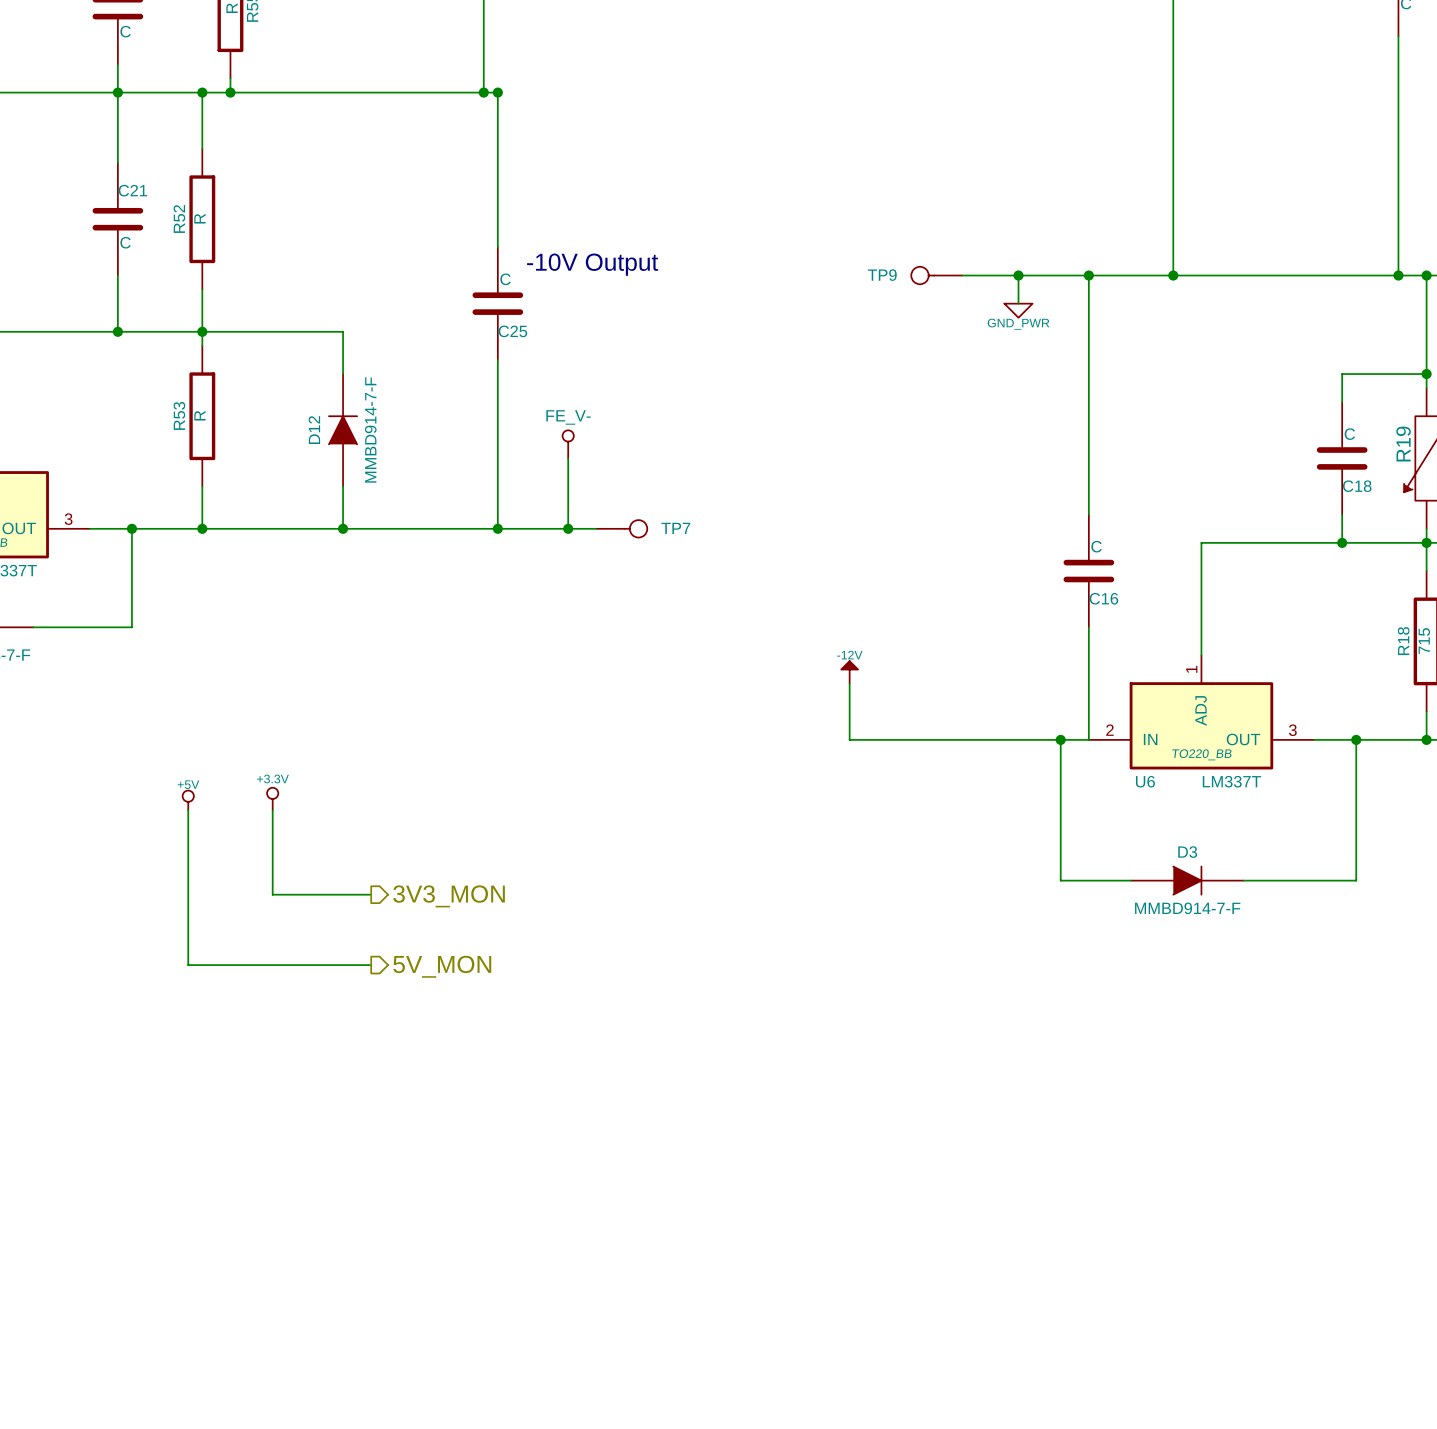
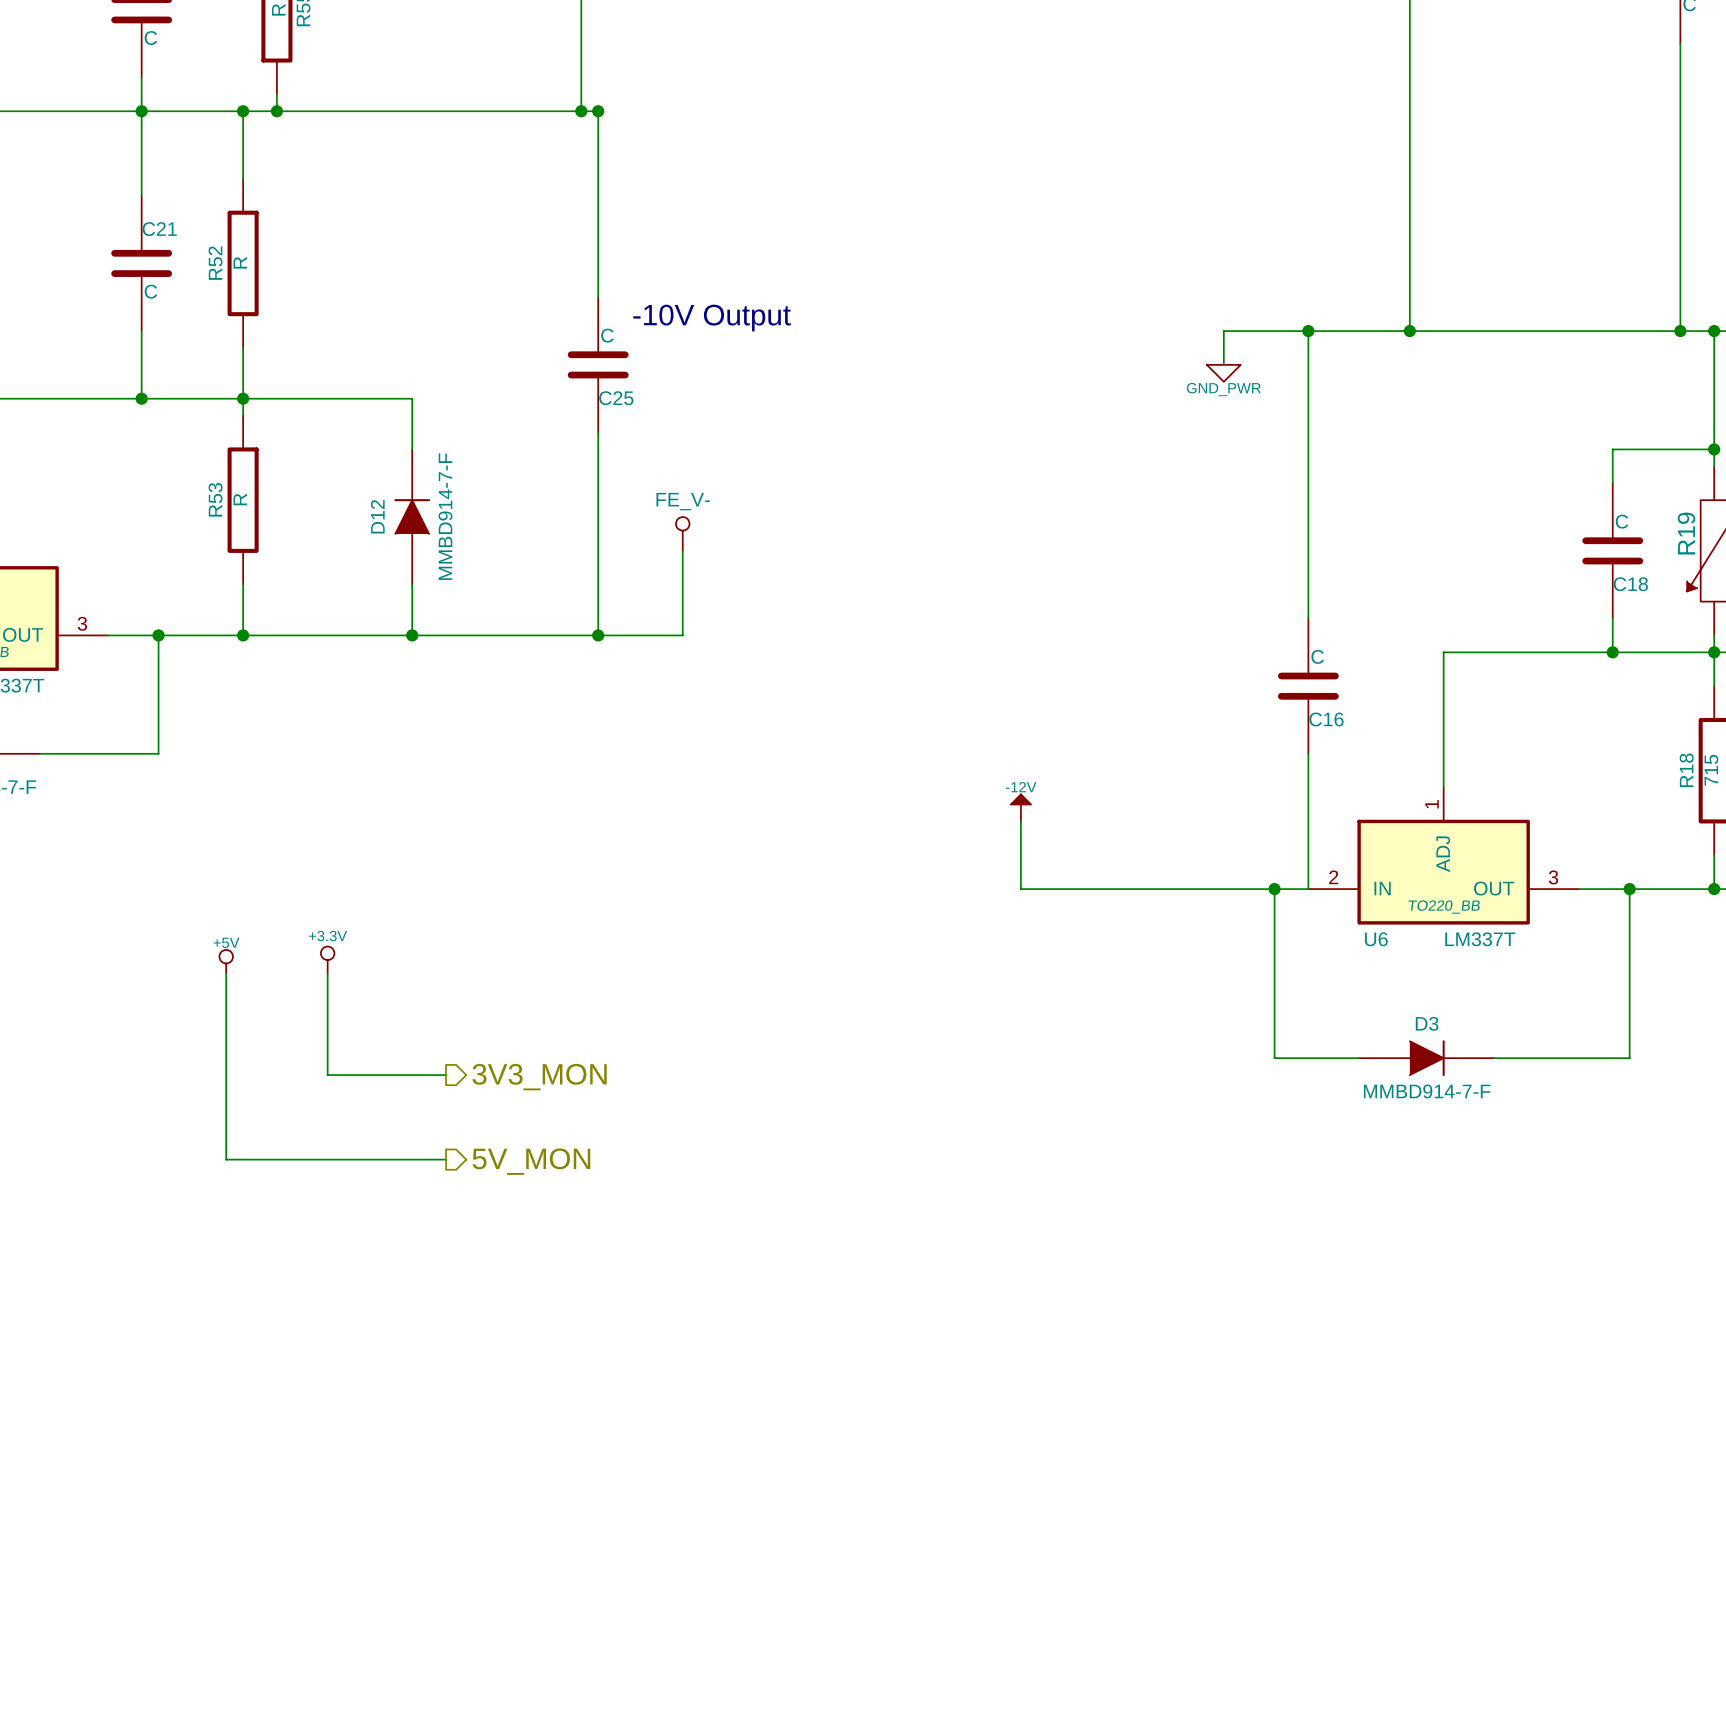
TP9: (936, 275) -> none
wire: (962, 275) (1018, 275) -> none
junction: (1018, 275) -> none
wire: (568, 528) (596, 528) -> none
junction: (568, 528) -> none
TP7: (621, 528) -> none

